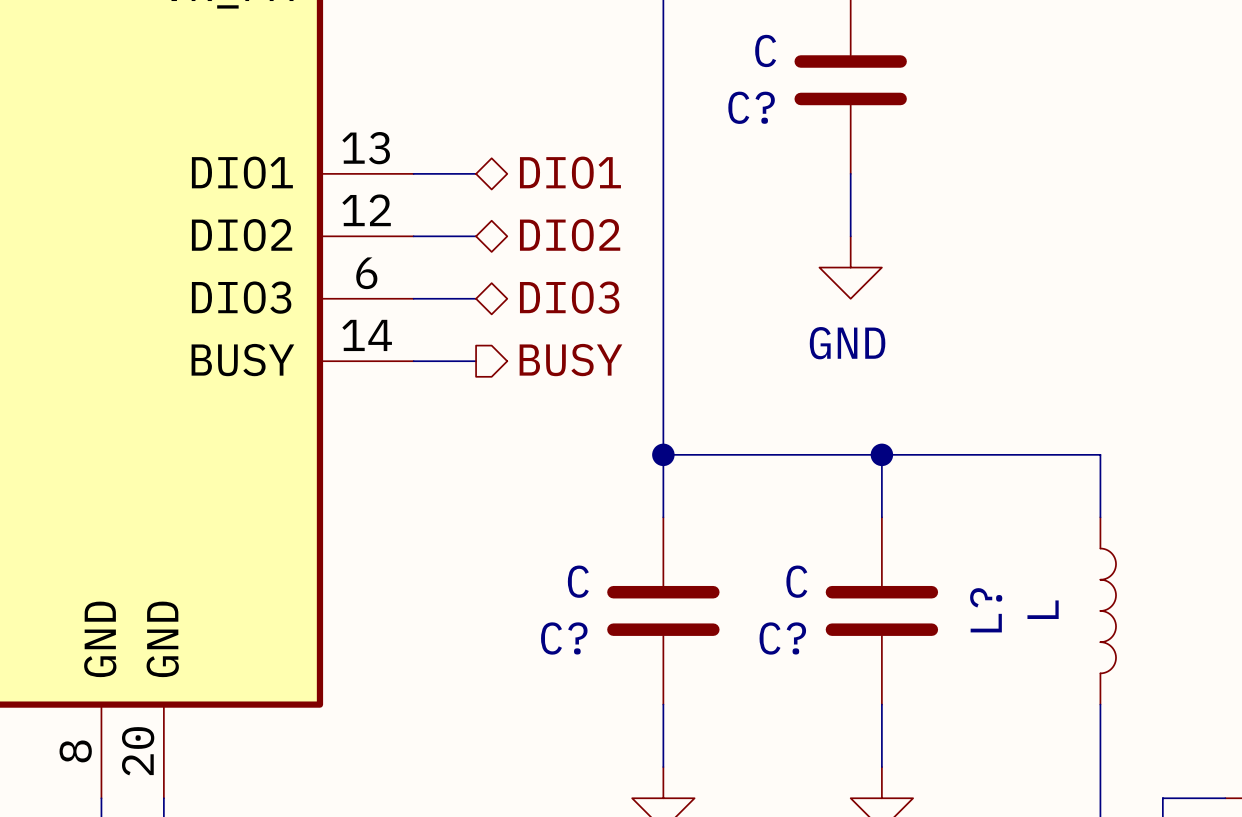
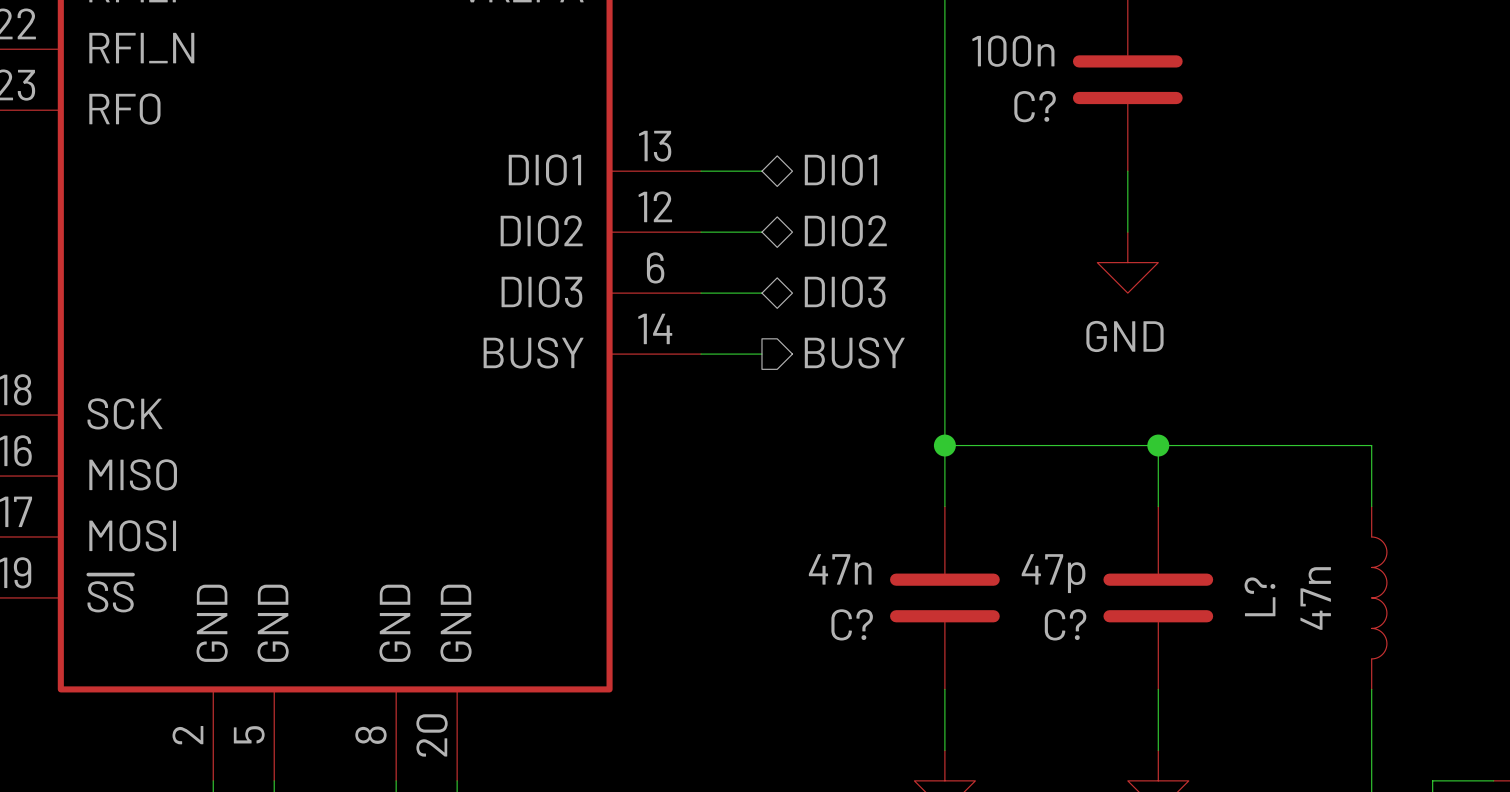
C? value: C (765, 50) -> 100n (1013, 51)
C? value: C (578, 581) -> 47n (840, 569)
C? value: C (796, 581) -> 47p (1053, 573)
L? value: L (1043, 609) -> 47n (1315, 598)

